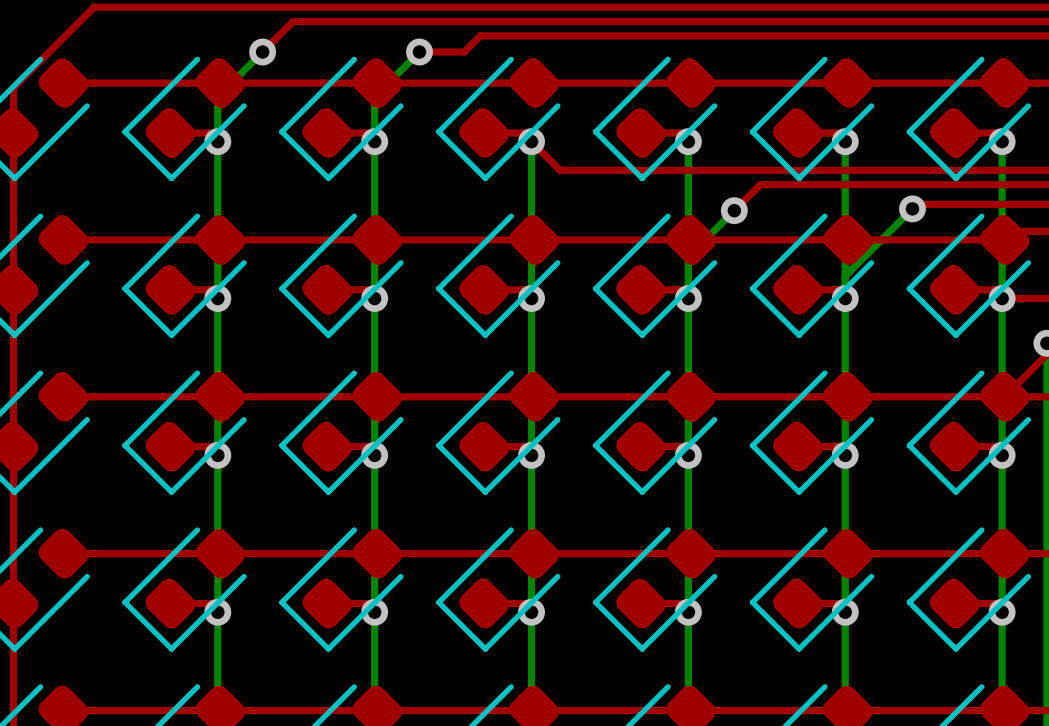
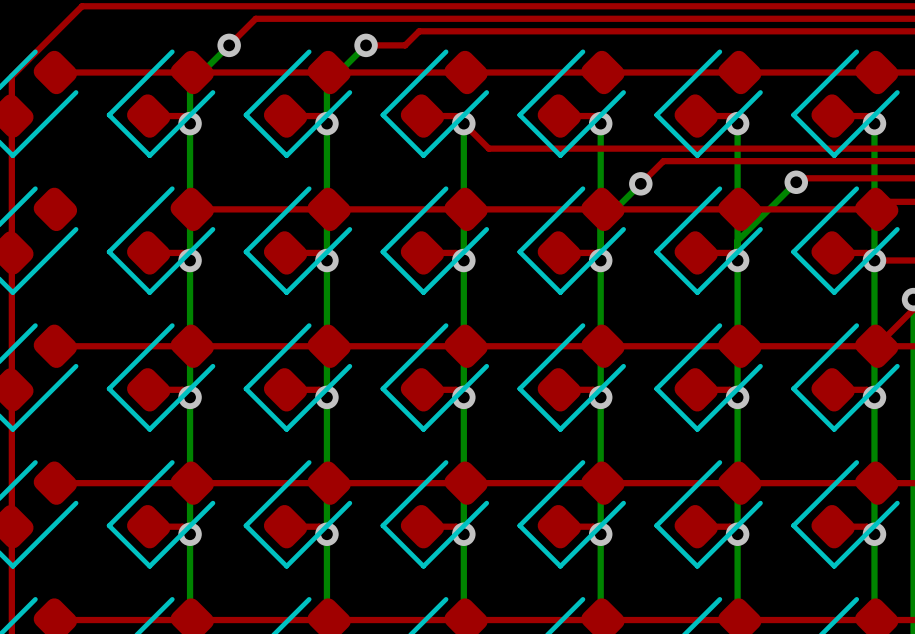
top track: (63, 239) (220, 239) -> none

